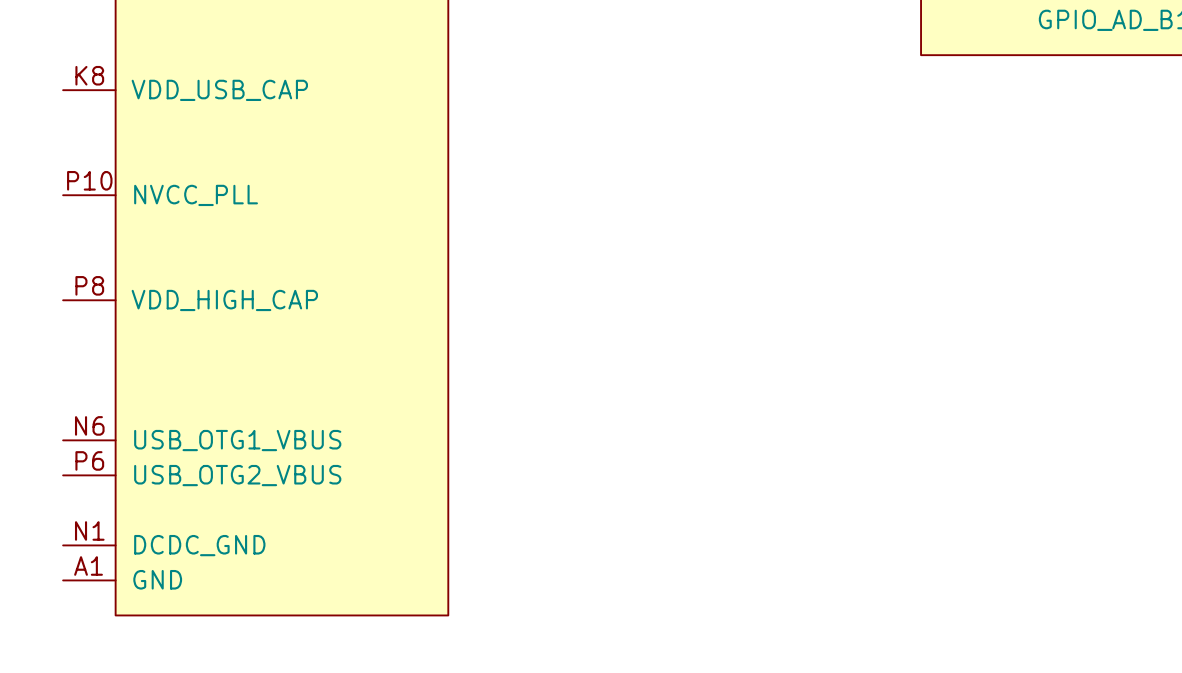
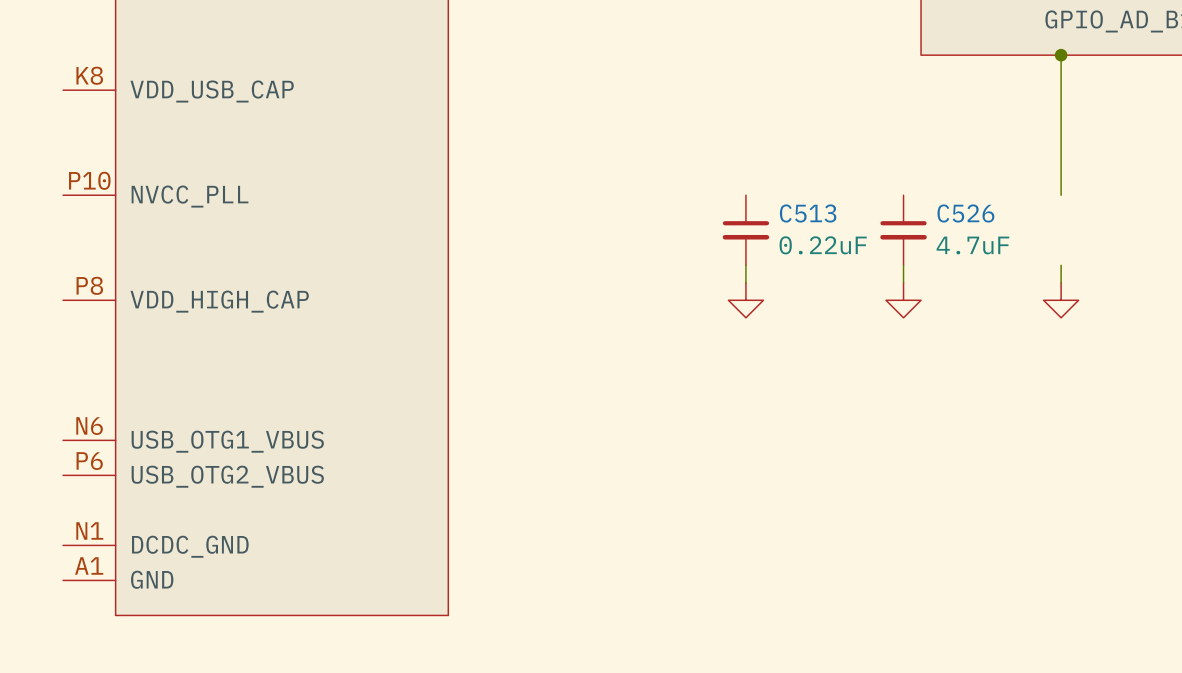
wire: none -> (1061, 55) (1061, 195)
junction: none -> (1061, 55)
C513: none -> 0.22uF (745, 230)
C526: none -> 4.7uF (903, 230)
wire: none -> (745, 265) (745, 282)
wire: none -> (903, 265) (903, 282)
wire: none -> (1061, 265) (1061, 282)
power symbol: none -> (745, 300)
power symbol: none -> (903, 300)
power symbol: none -> (1061, 300)

